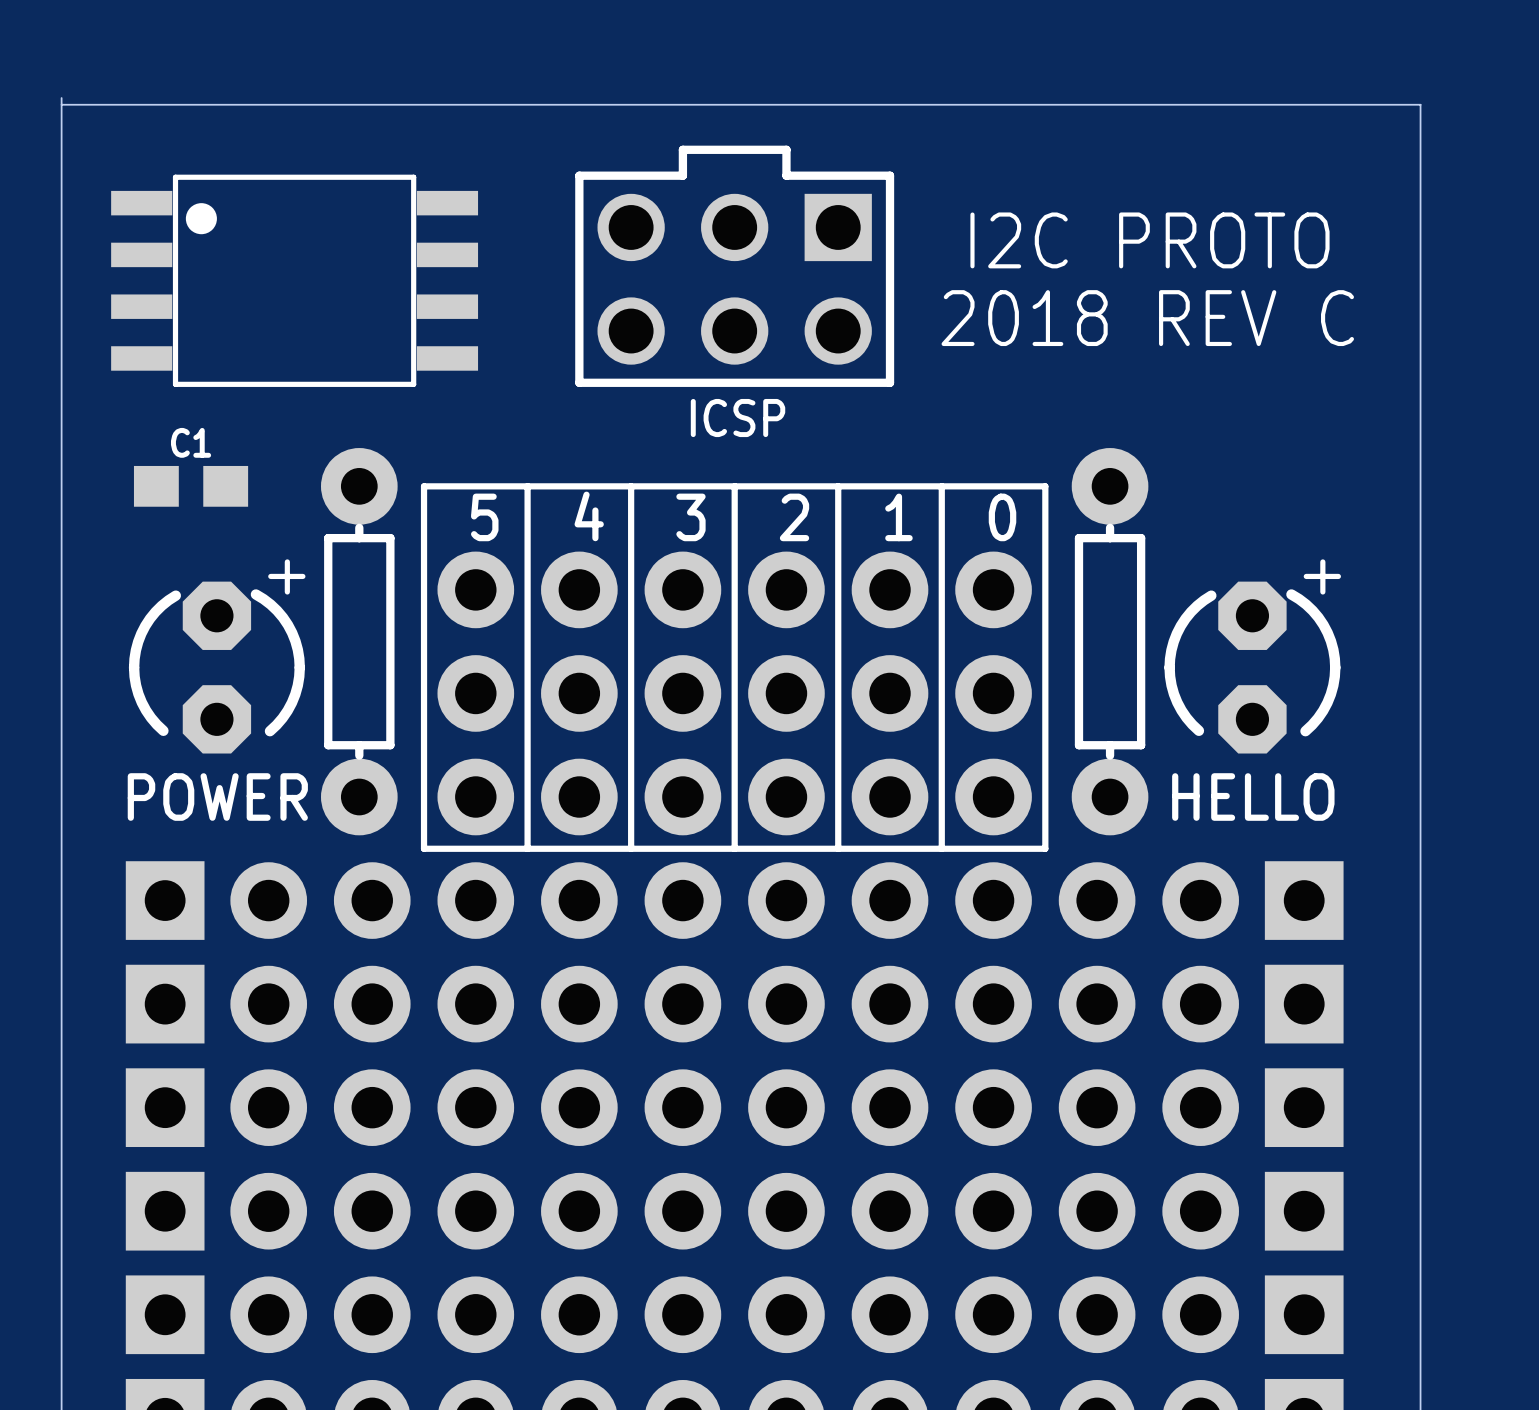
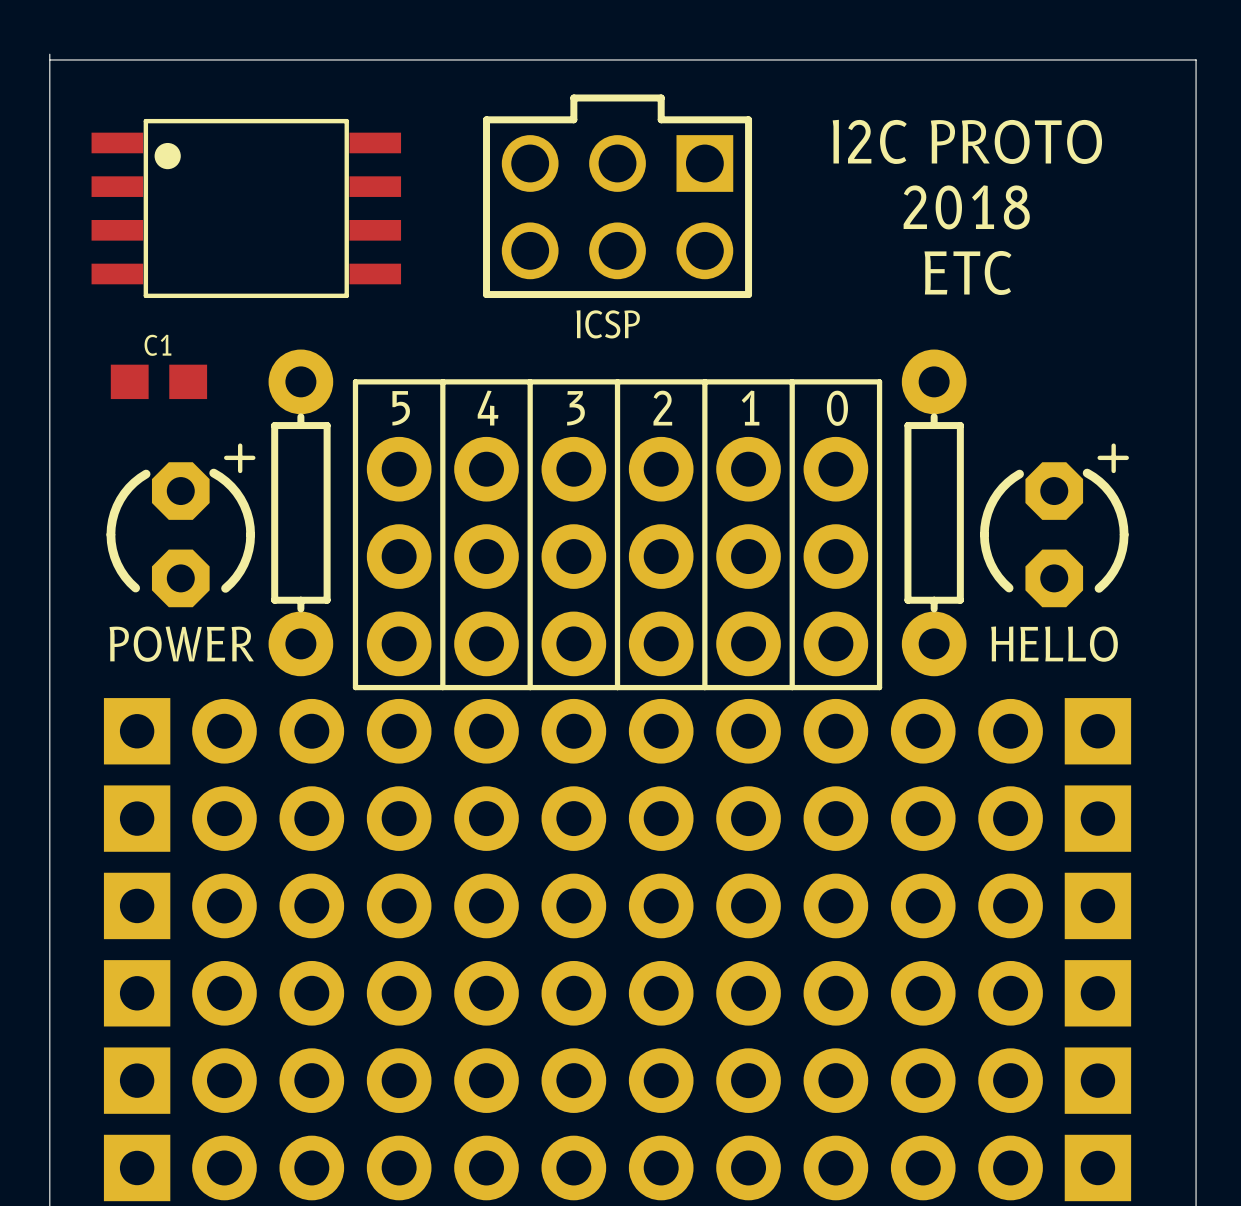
text position: I2C PROTO (1150, 240) -> I2C PROTO (967, 141)
text: none -> 2018 (966, 207)
text: 2018 REV C (1147, 318) -> none
text: none -> ETC (967, 272)

